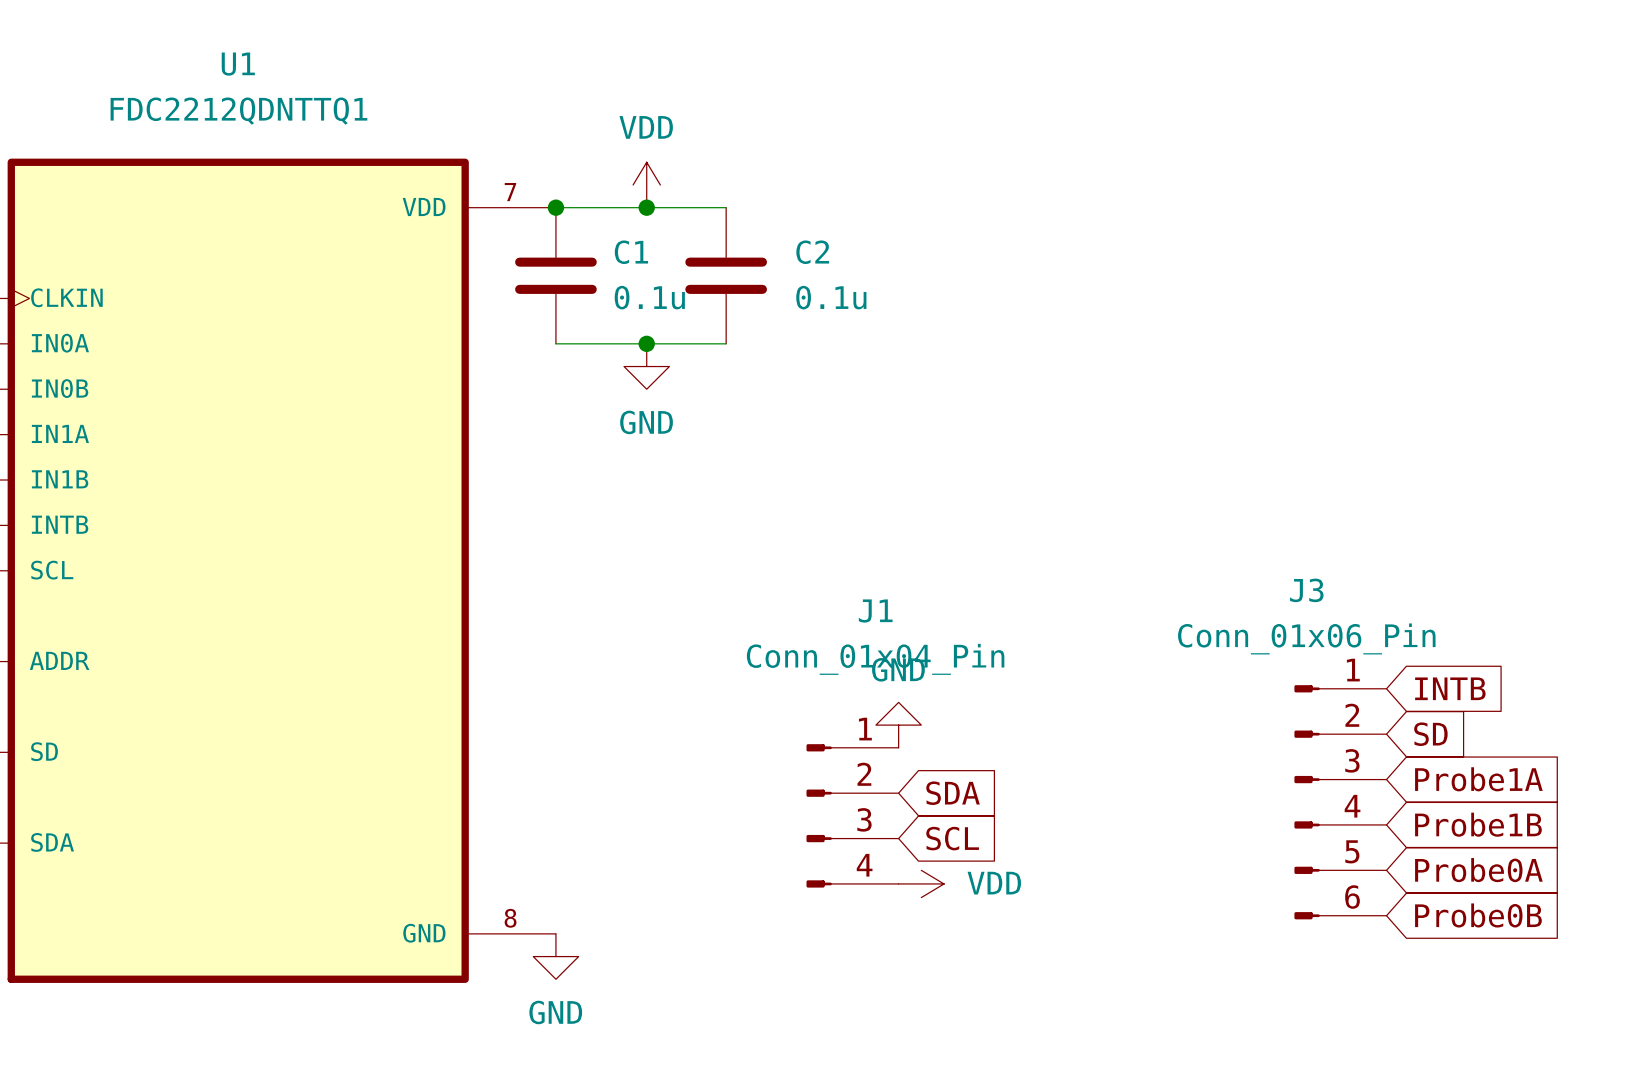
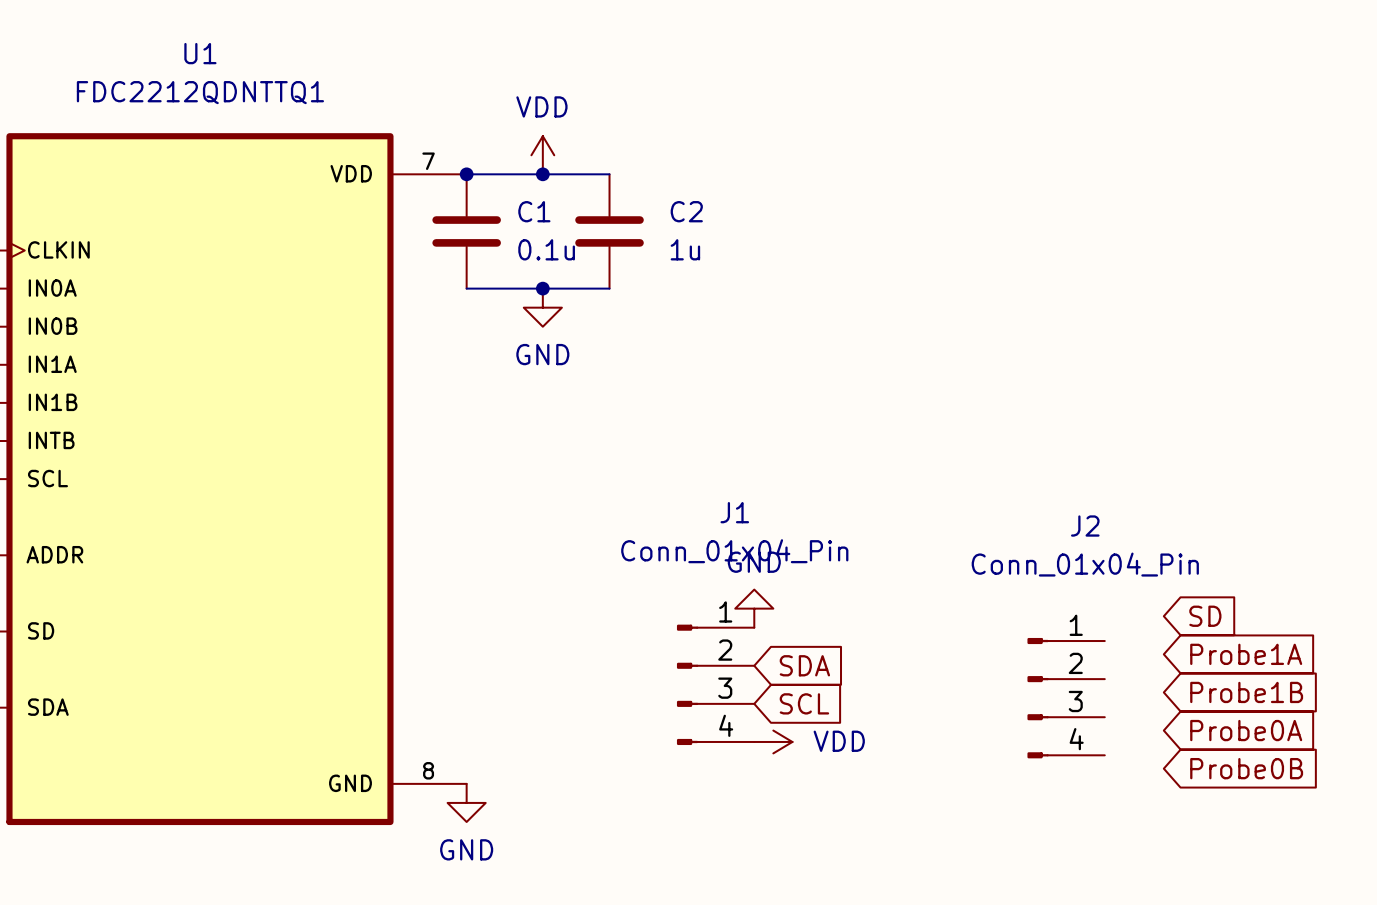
C2 value: 0.1u (831, 297) -> 1u (685, 249)
global label: INTB (1450, 688) -> none
J3: Conn_01x06_Pin (1340, 802) -> none
J2: none -> Conn_01x04_Pin (1066, 698)

